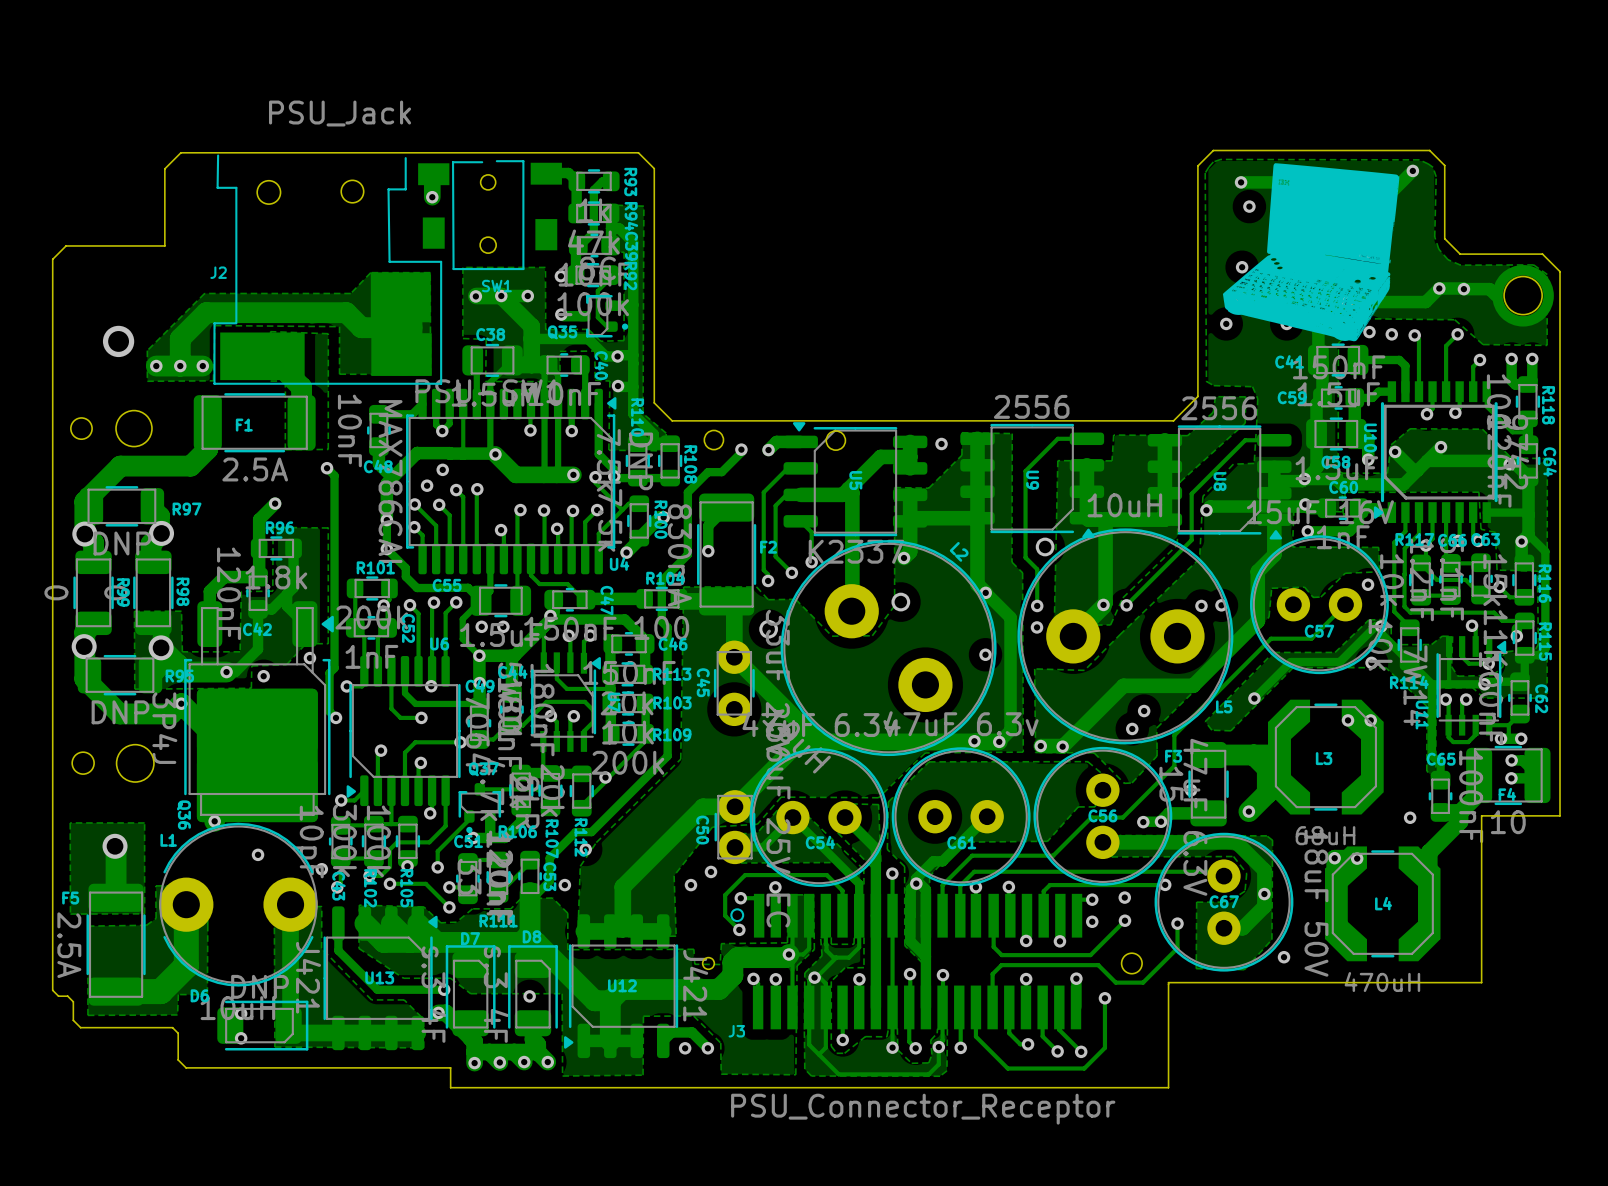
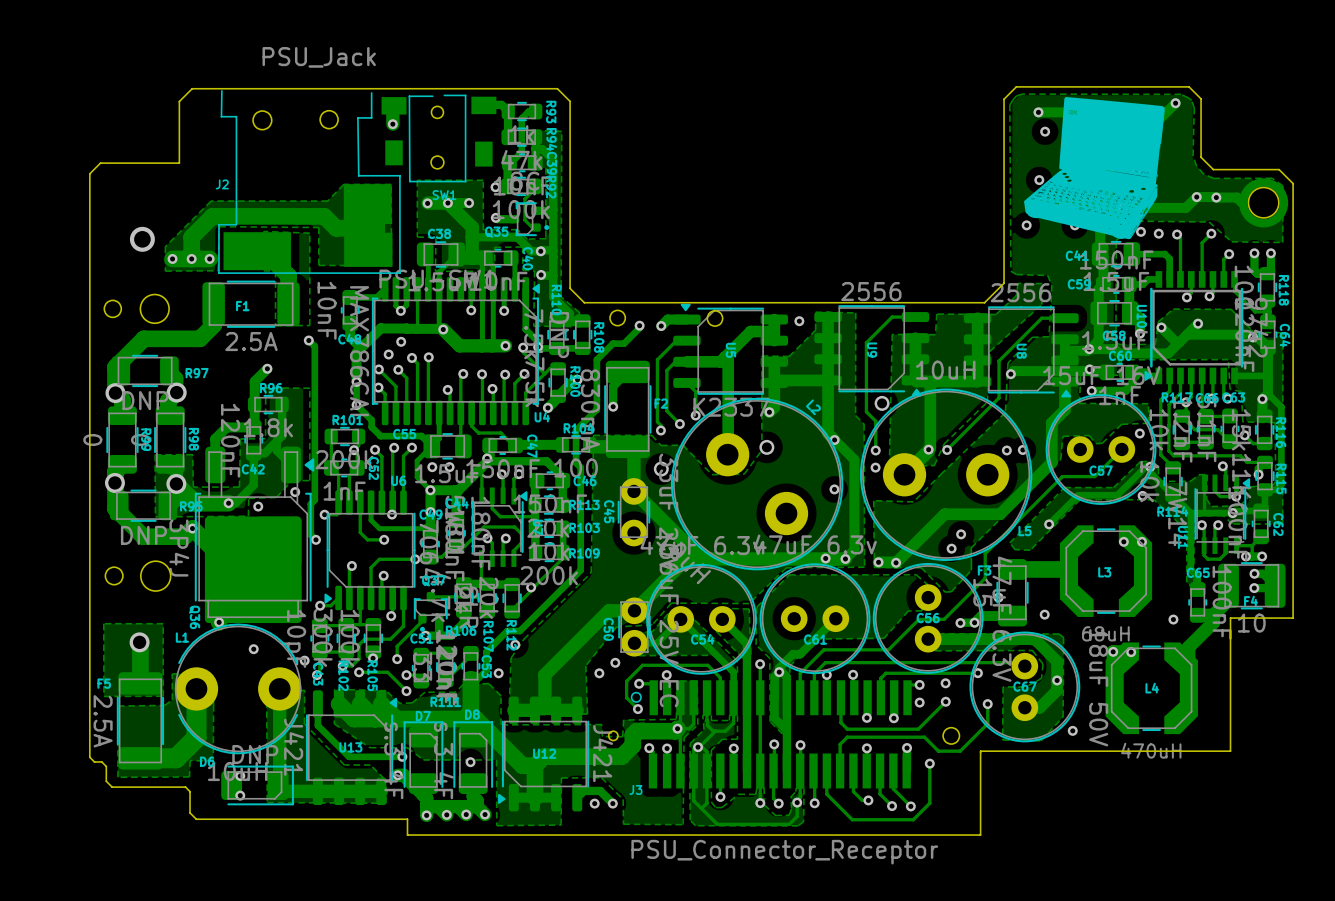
track: (1253, 755) (1267, 768) (1267, 793) (1248, 811) -> none

